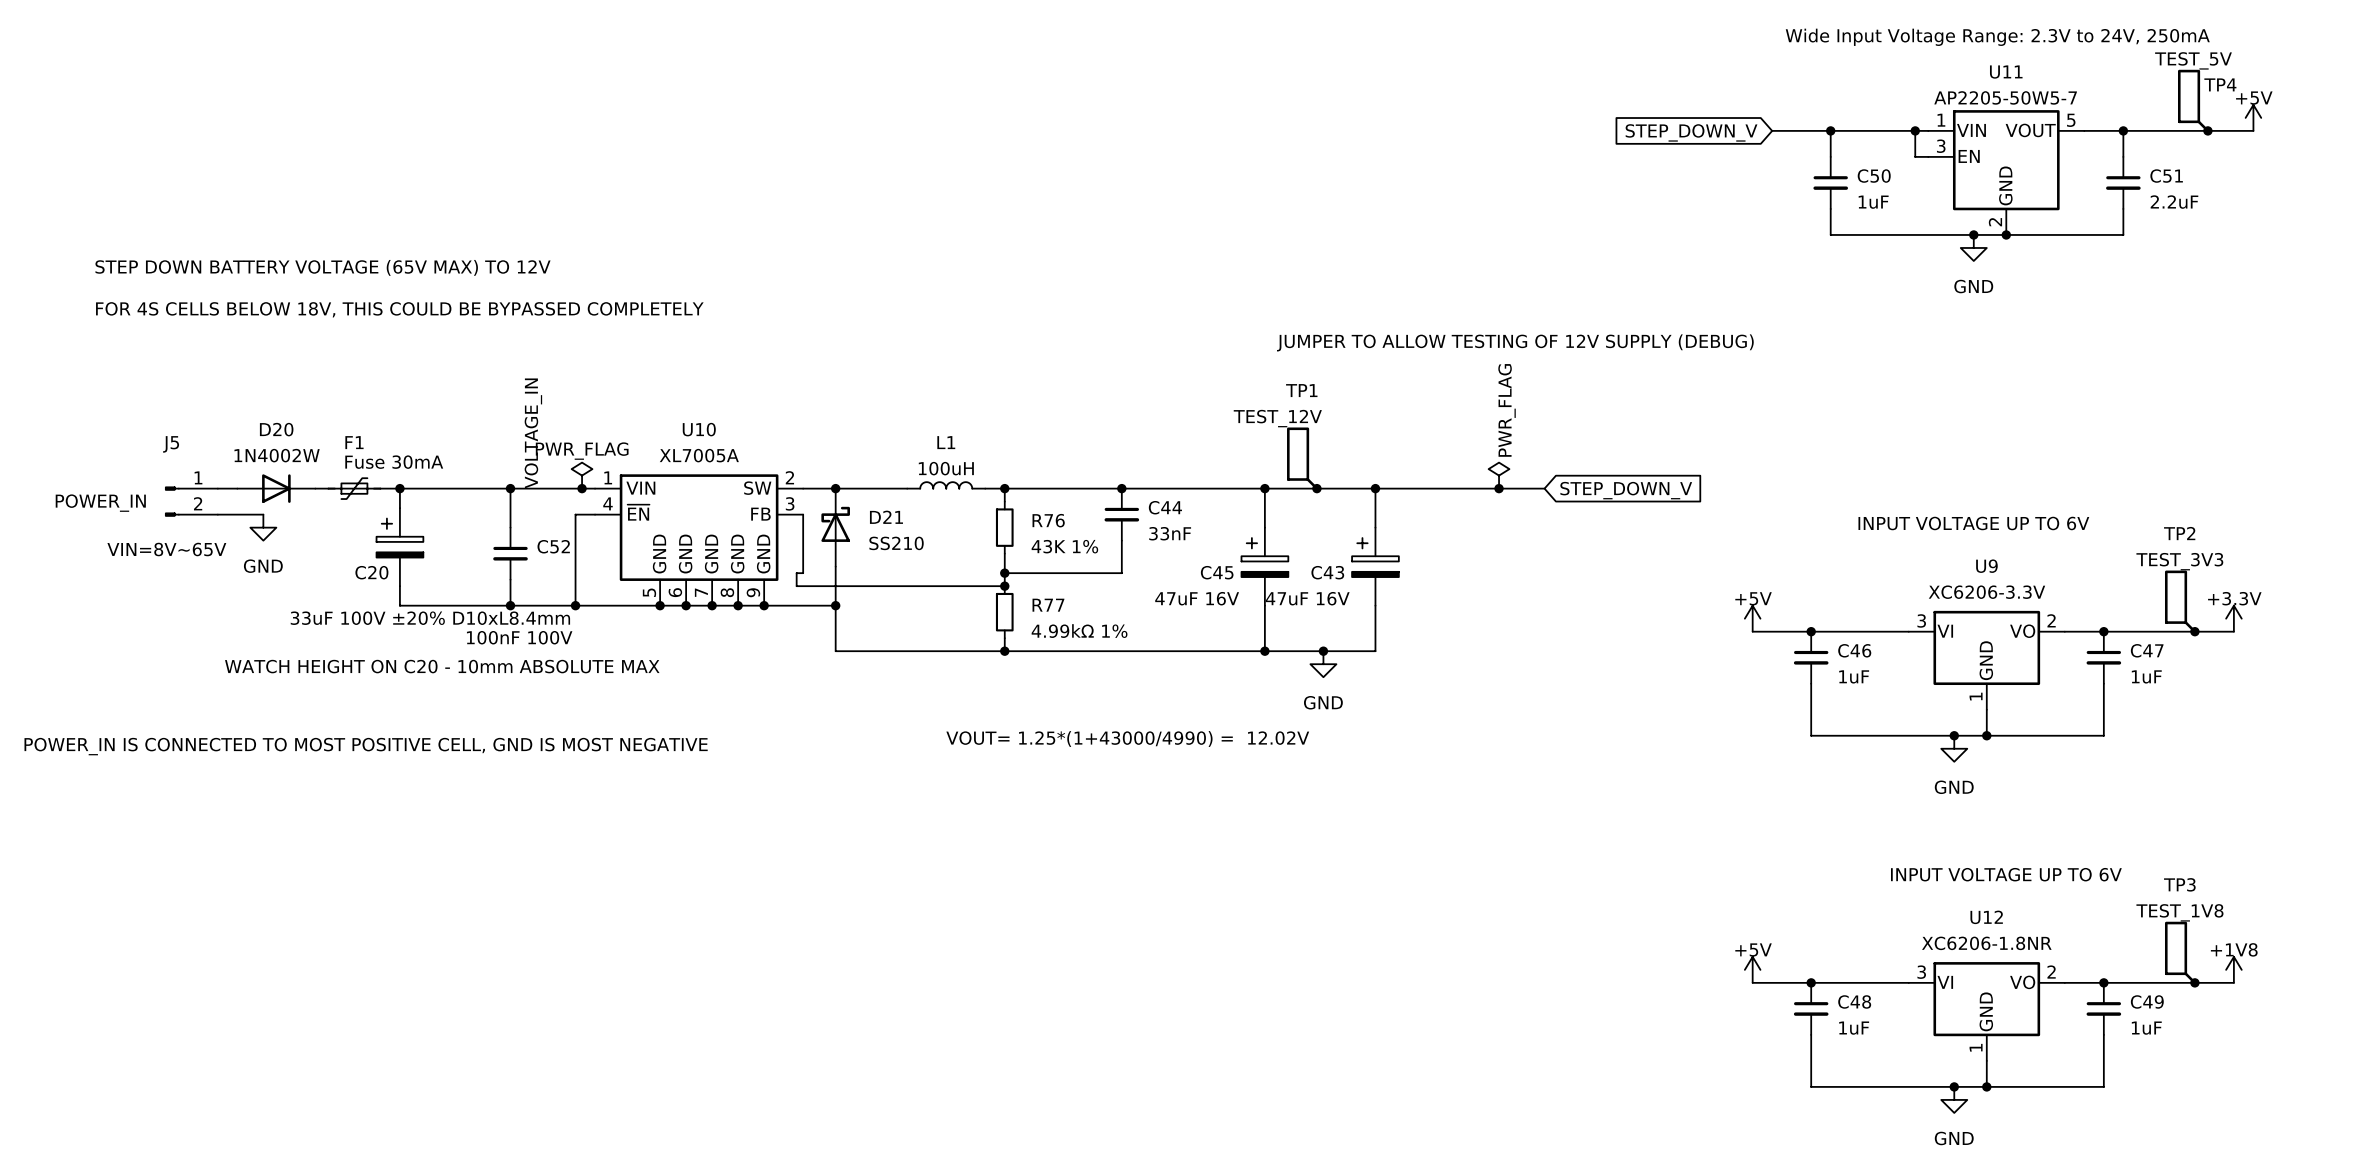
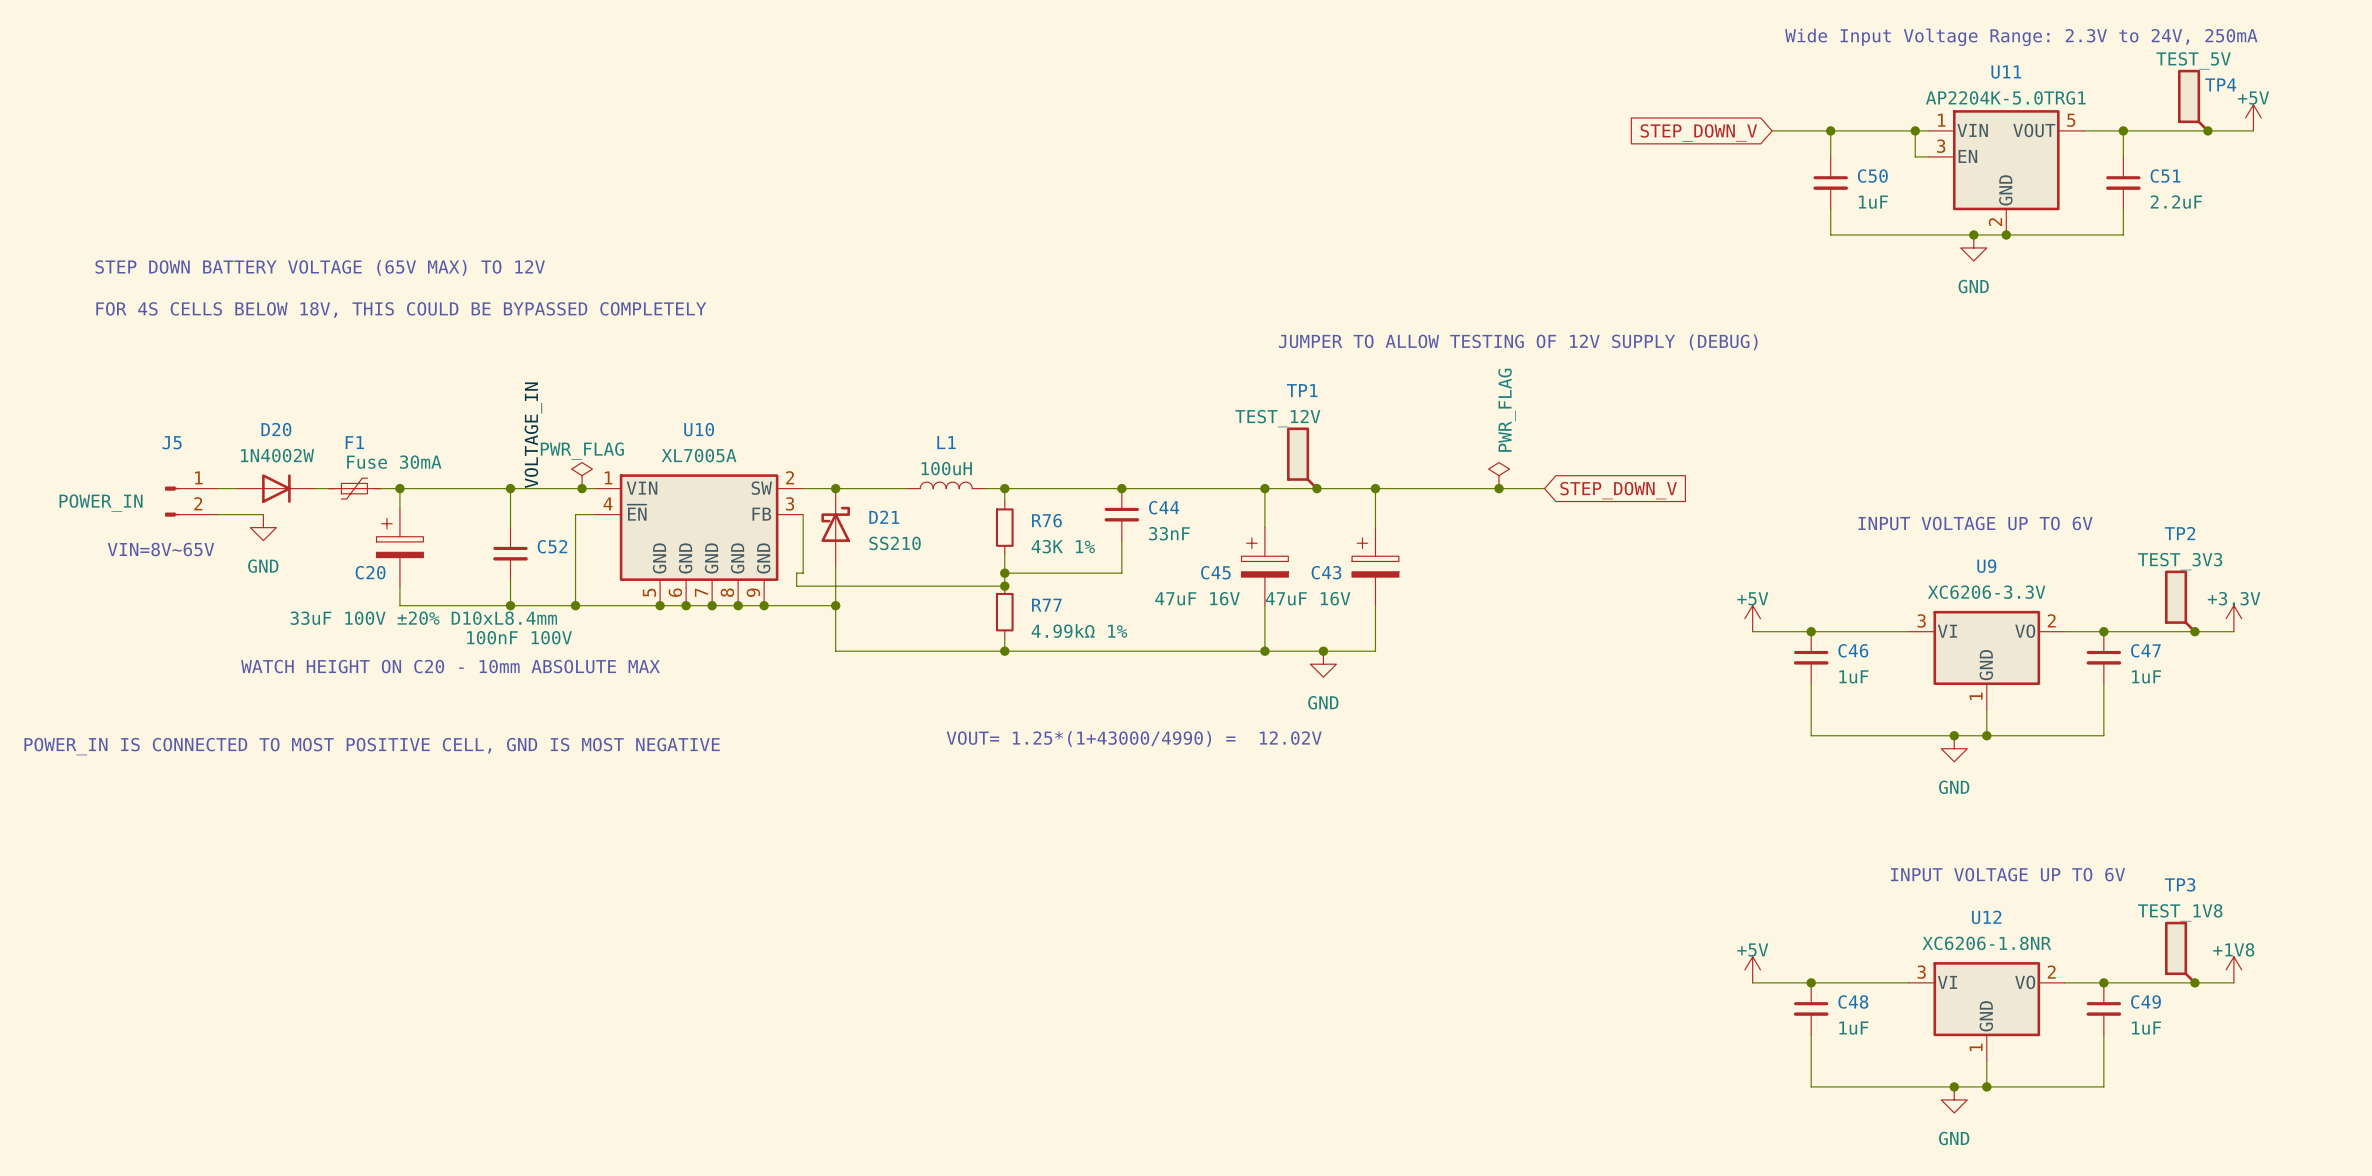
U11 value: AP2205-50W5-7 (2005, 97) -> AP2204K-5.0TRG1 (2005, 97)

